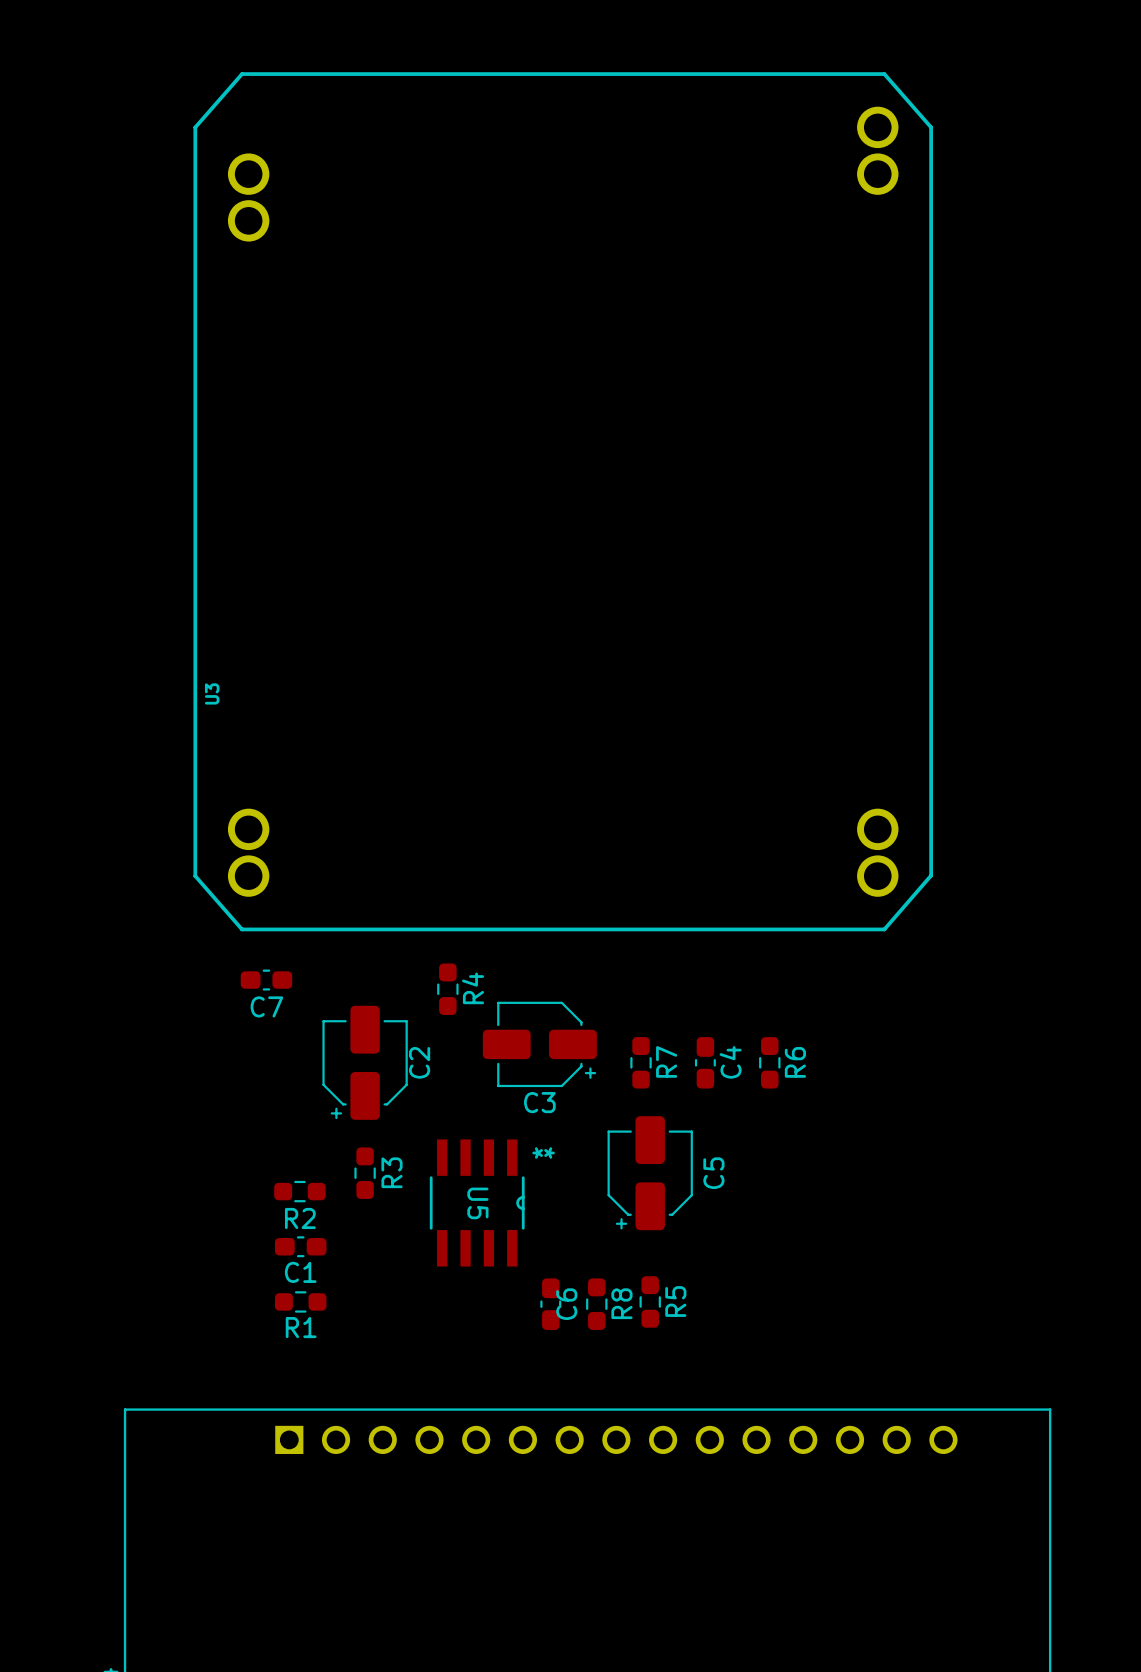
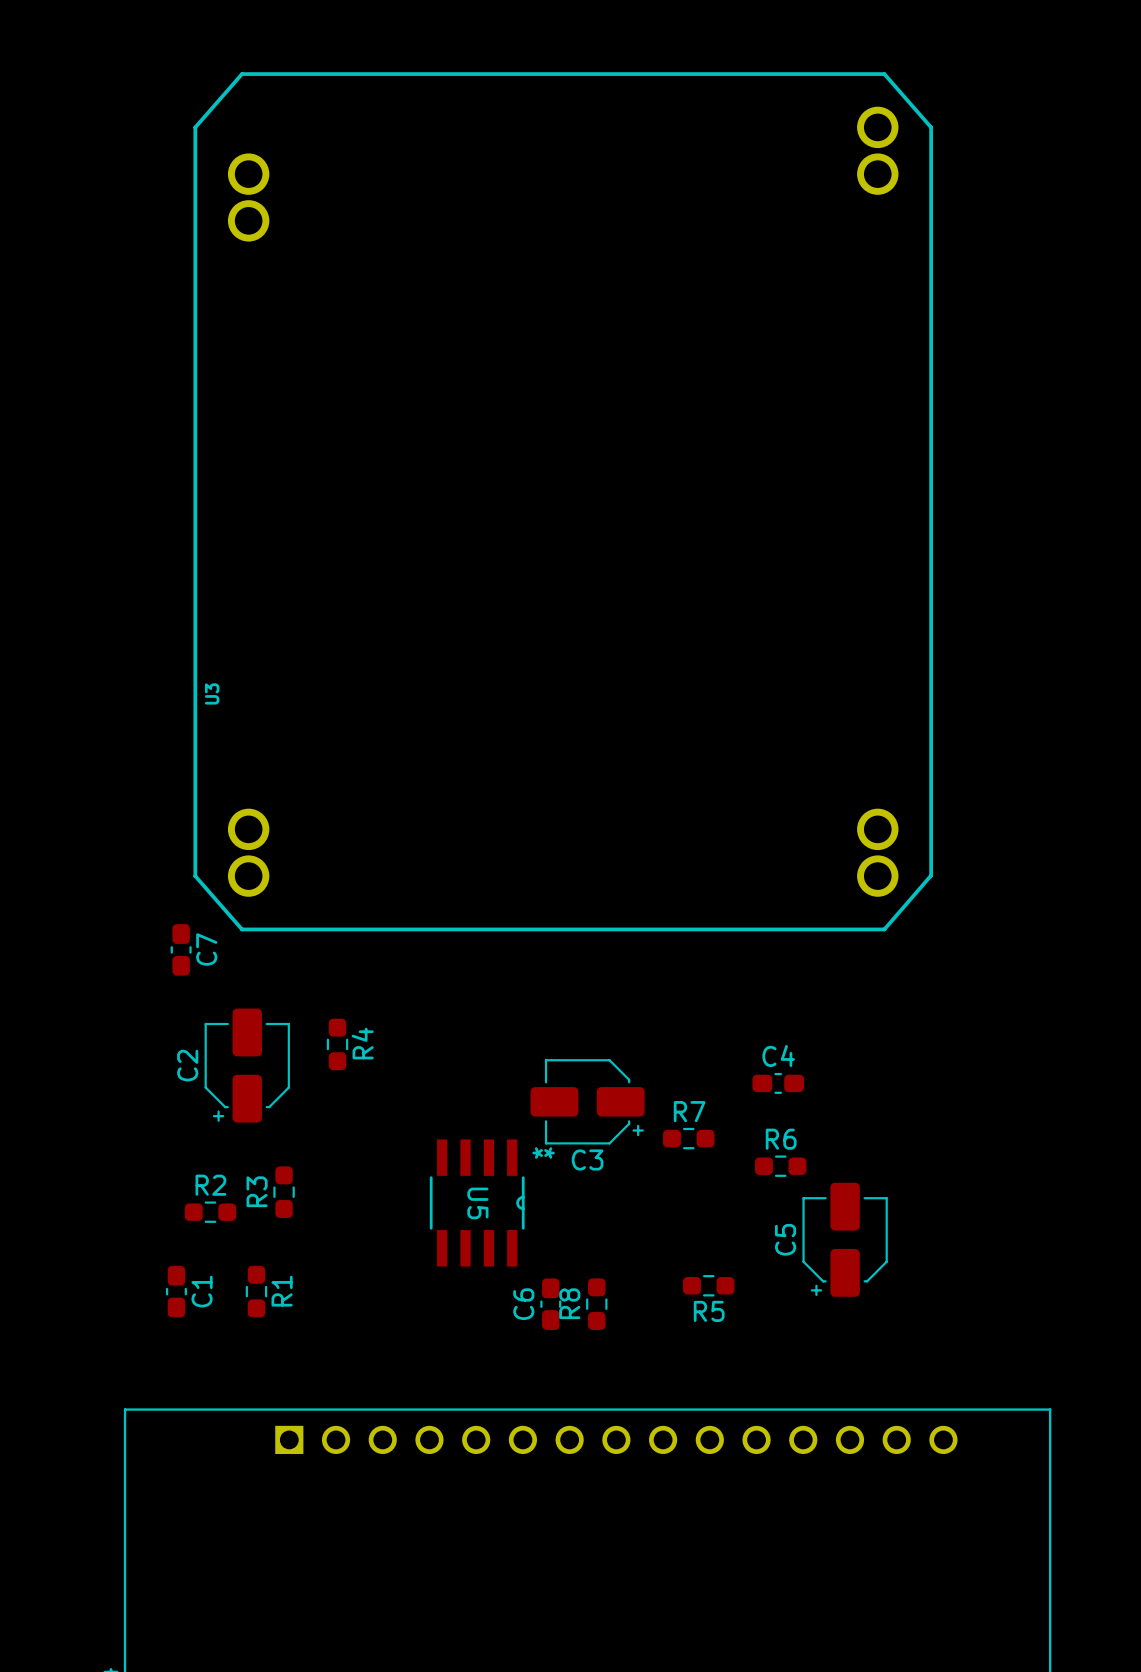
C7 rotation: 0° (266, 980) -> 90° clockwise (181, 949)
C7 position: (266, 980) -> (181, 949)
R4 position: (447, 989) -> (337, 1044)
C7 name position: C7 (266, 1006) -> C7 (206, 949)
C3 position: (539, 1044) -> (587, 1101)
R7 name position: R7 (666, 1061) -> R7 (689, 1111)
C2 position: (365, 1062) -> (247, 1065)
C2 name position: C2 (419, 1062) -> C2 (187, 1065)
R7 rotation: 0° (641, 1062) -> 90° clockwise (688, 1138)
R7 position: (641, 1062) -> (688, 1138)
C4 rotation: 0° (705, 1062) -> 90° clockwise (778, 1083)
C4 position: (705, 1062) -> (778, 1083)
C4 name position: C4 (730, 1062) -> C4 (778, 1055)
R6 rotation: 0° (769, 1062) -> 90° clockwise (780, 1166)
R6 position: (769, 1062) -> (780, 1166)
R6 name position: R6 (795, 1062) -> R6 (781, 1139)
R3 name position: R3 (392, 1172) -> R3 (257, 1191)
R3 position: (365, 1173) -> (284, 1192)
C5 position: (650, 1173) -> (845, 1239)
C5 name position: C5 (713, 1173) -> C5 (785, 1239)
R2 position: (299, 1191) -> (210, 1212)
R2 name position: R2 (300, 1218) -> R2 (210, 1185)
C1 rotation: 0° (300, 1246) -> 90° clockwise (176, 1291)
C1 position: (300, 1246) -> (176, 1291)
C1 name position: C1 (300, 1272) -> C1 (202, 1291)
R1 rotation: 0° (300, 1301) -> 90° clockwise (256, 1291)
R1 position: (300, 1301) -> (256, 1291)
R5 rotation: 0° (650, 1301) -> 90° clockwise (708, 1285)
R5 position: (650, 1301) -> (708, 1285)
R8 name position: R8 (621, 1303) -> R8 (569, 1303)
C6 name position: C6 (566, 1304) -> C6 (523, 1304)
R1 name position: R1 (301, 1327) -> R1 (282, 1291)

